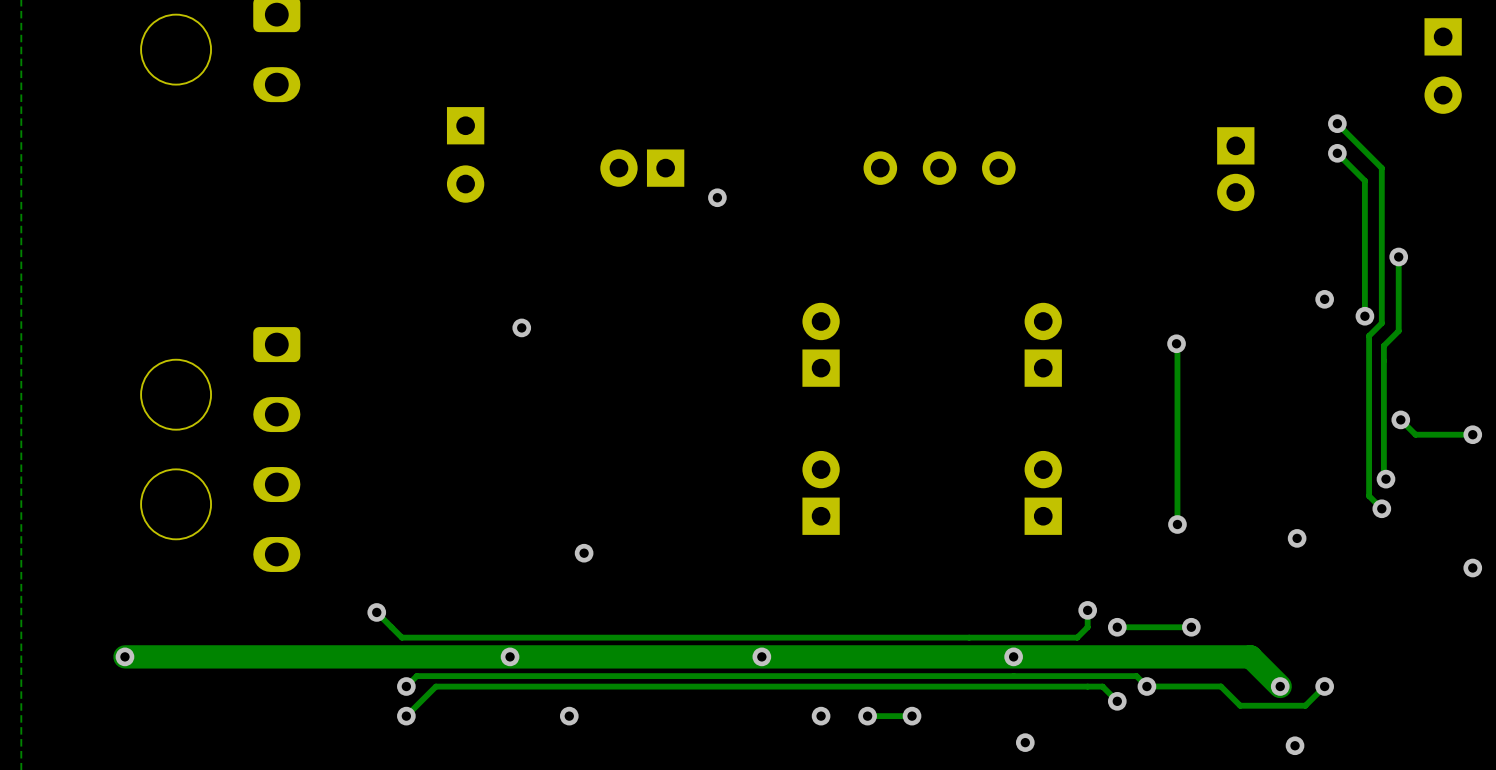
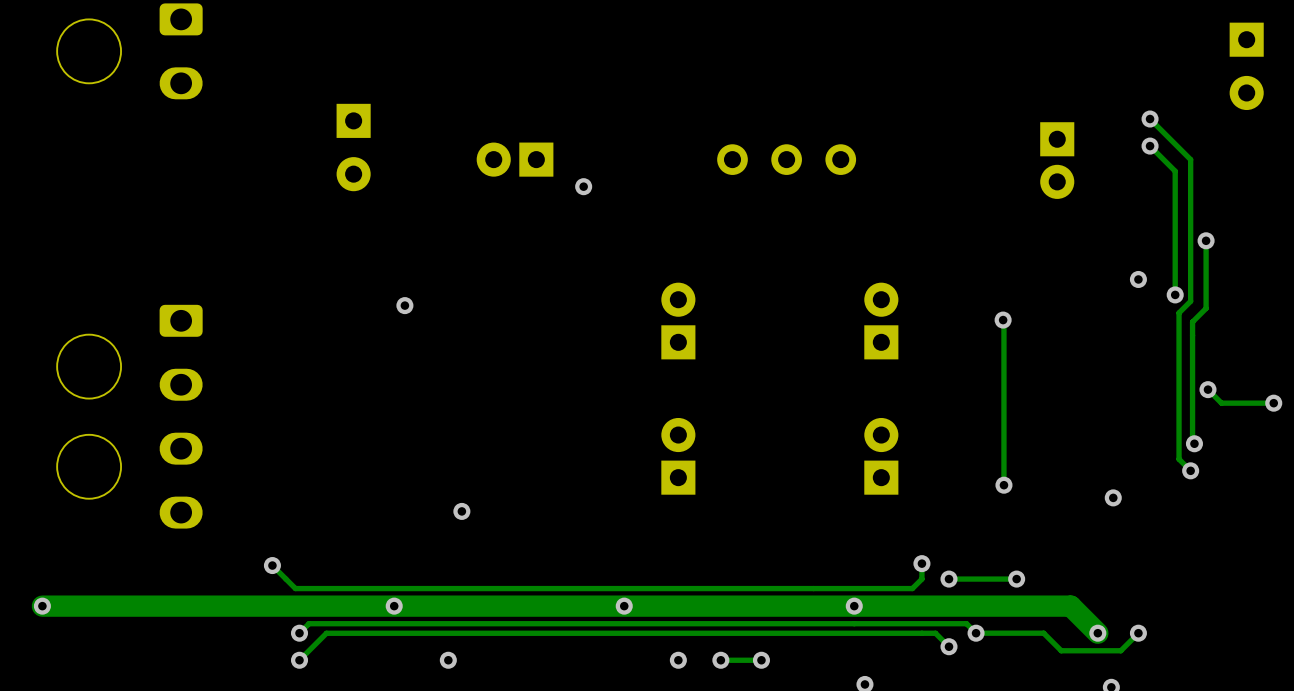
via: (1472, 568) -> none

